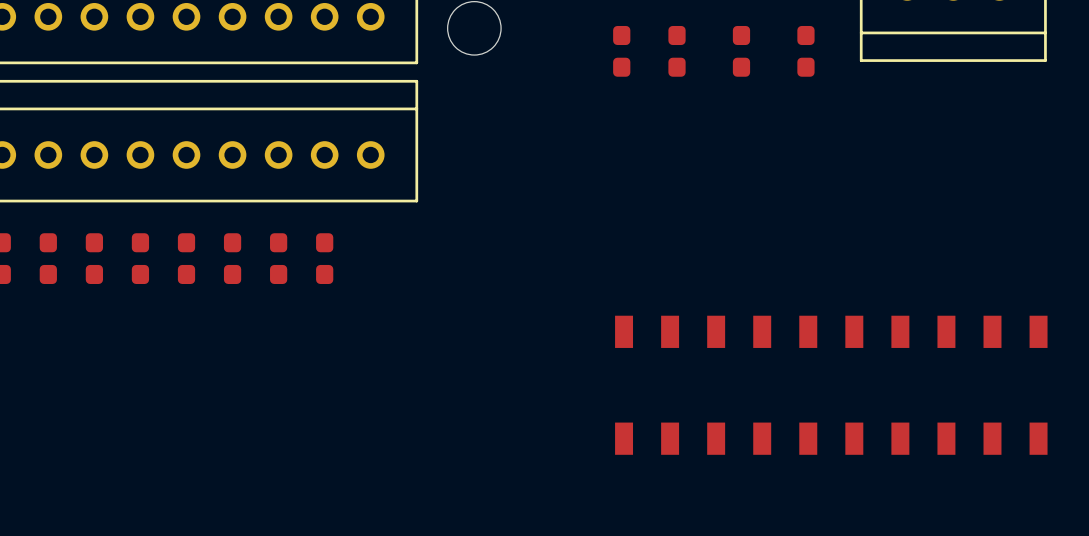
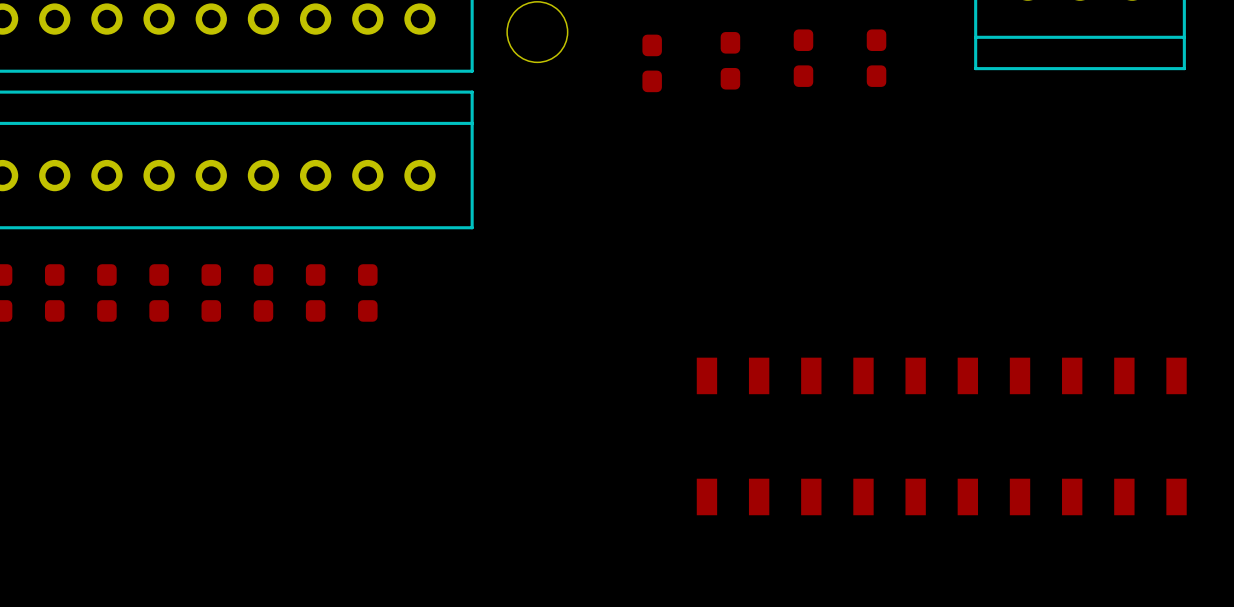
part: (621, 51) -> none
part: (677, 51) -> none
part: none -> (803, 58)
part: (741, 51) -> none
part: none -> (876, 58)
part: (805, 51) -> none
part: none -> (730, 60)
part: none -> (652, 63)

